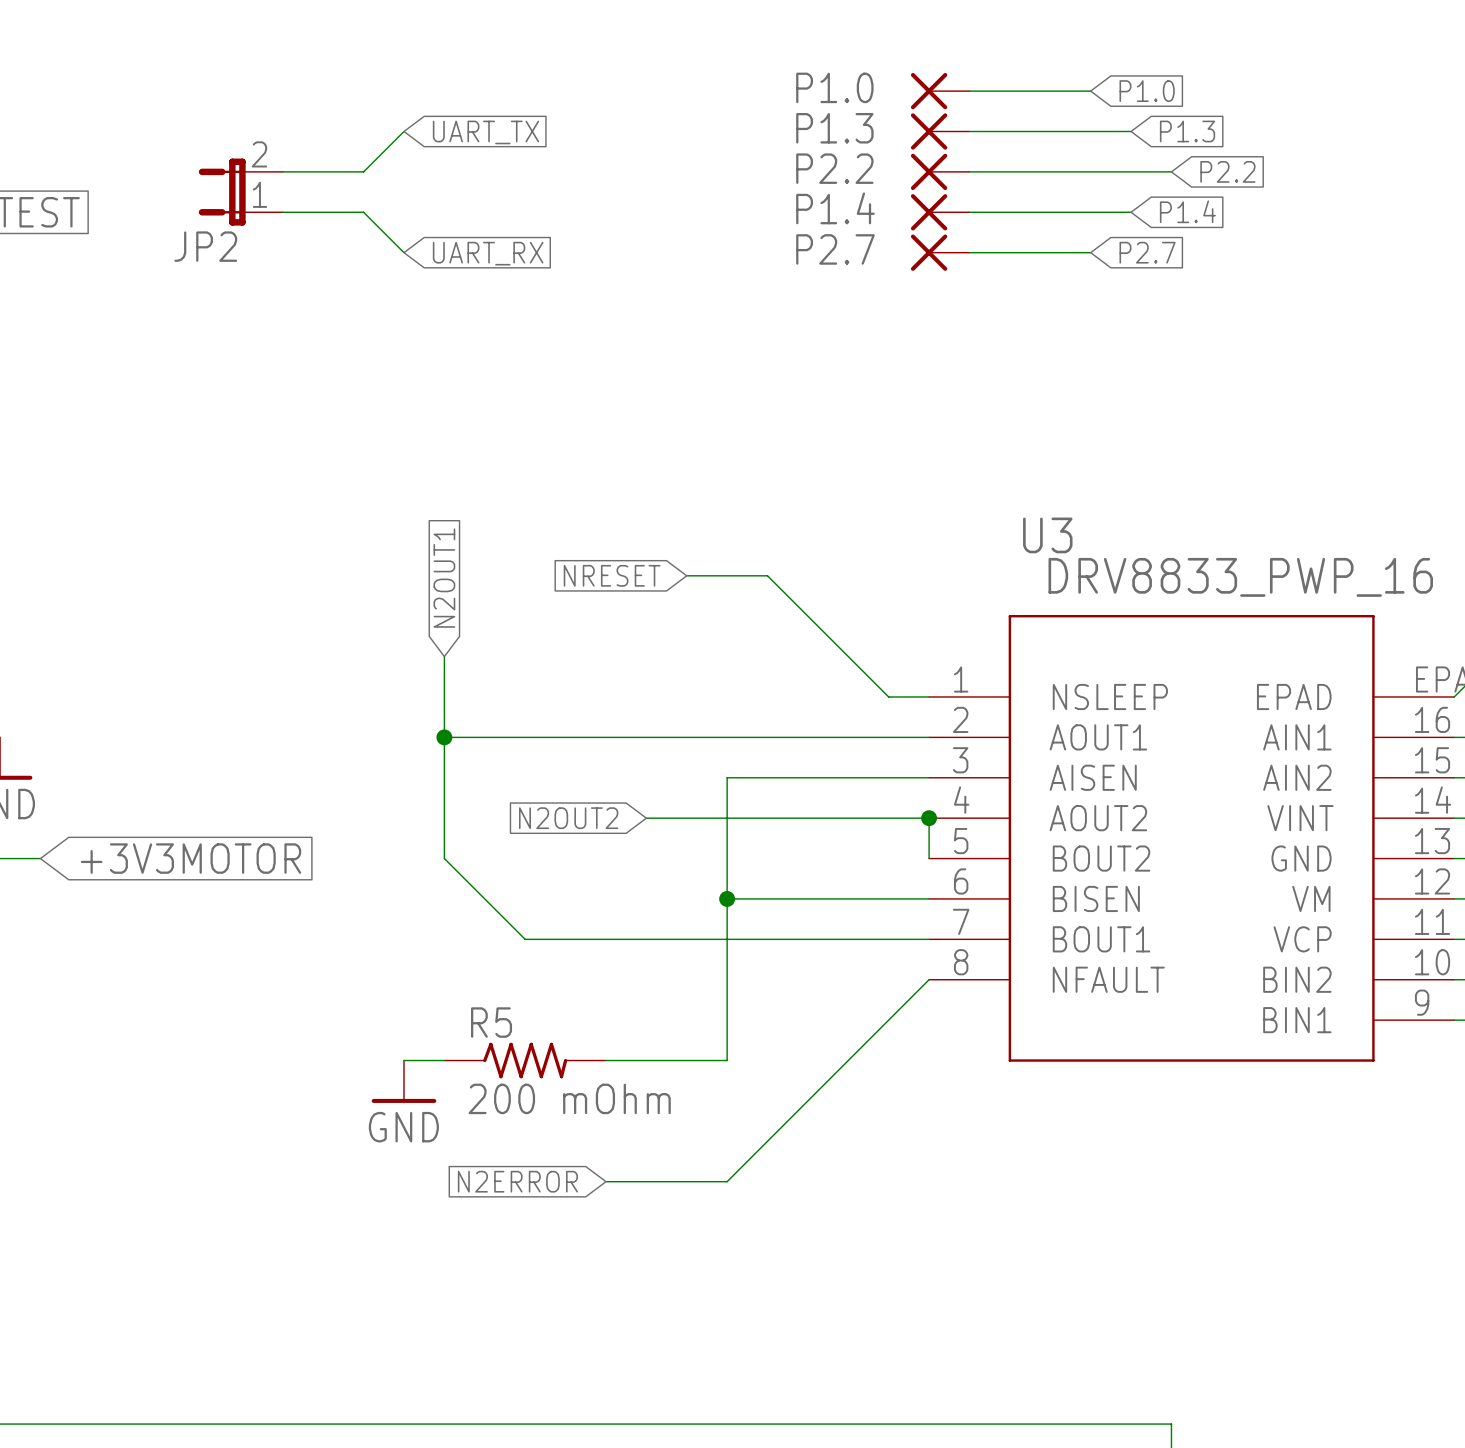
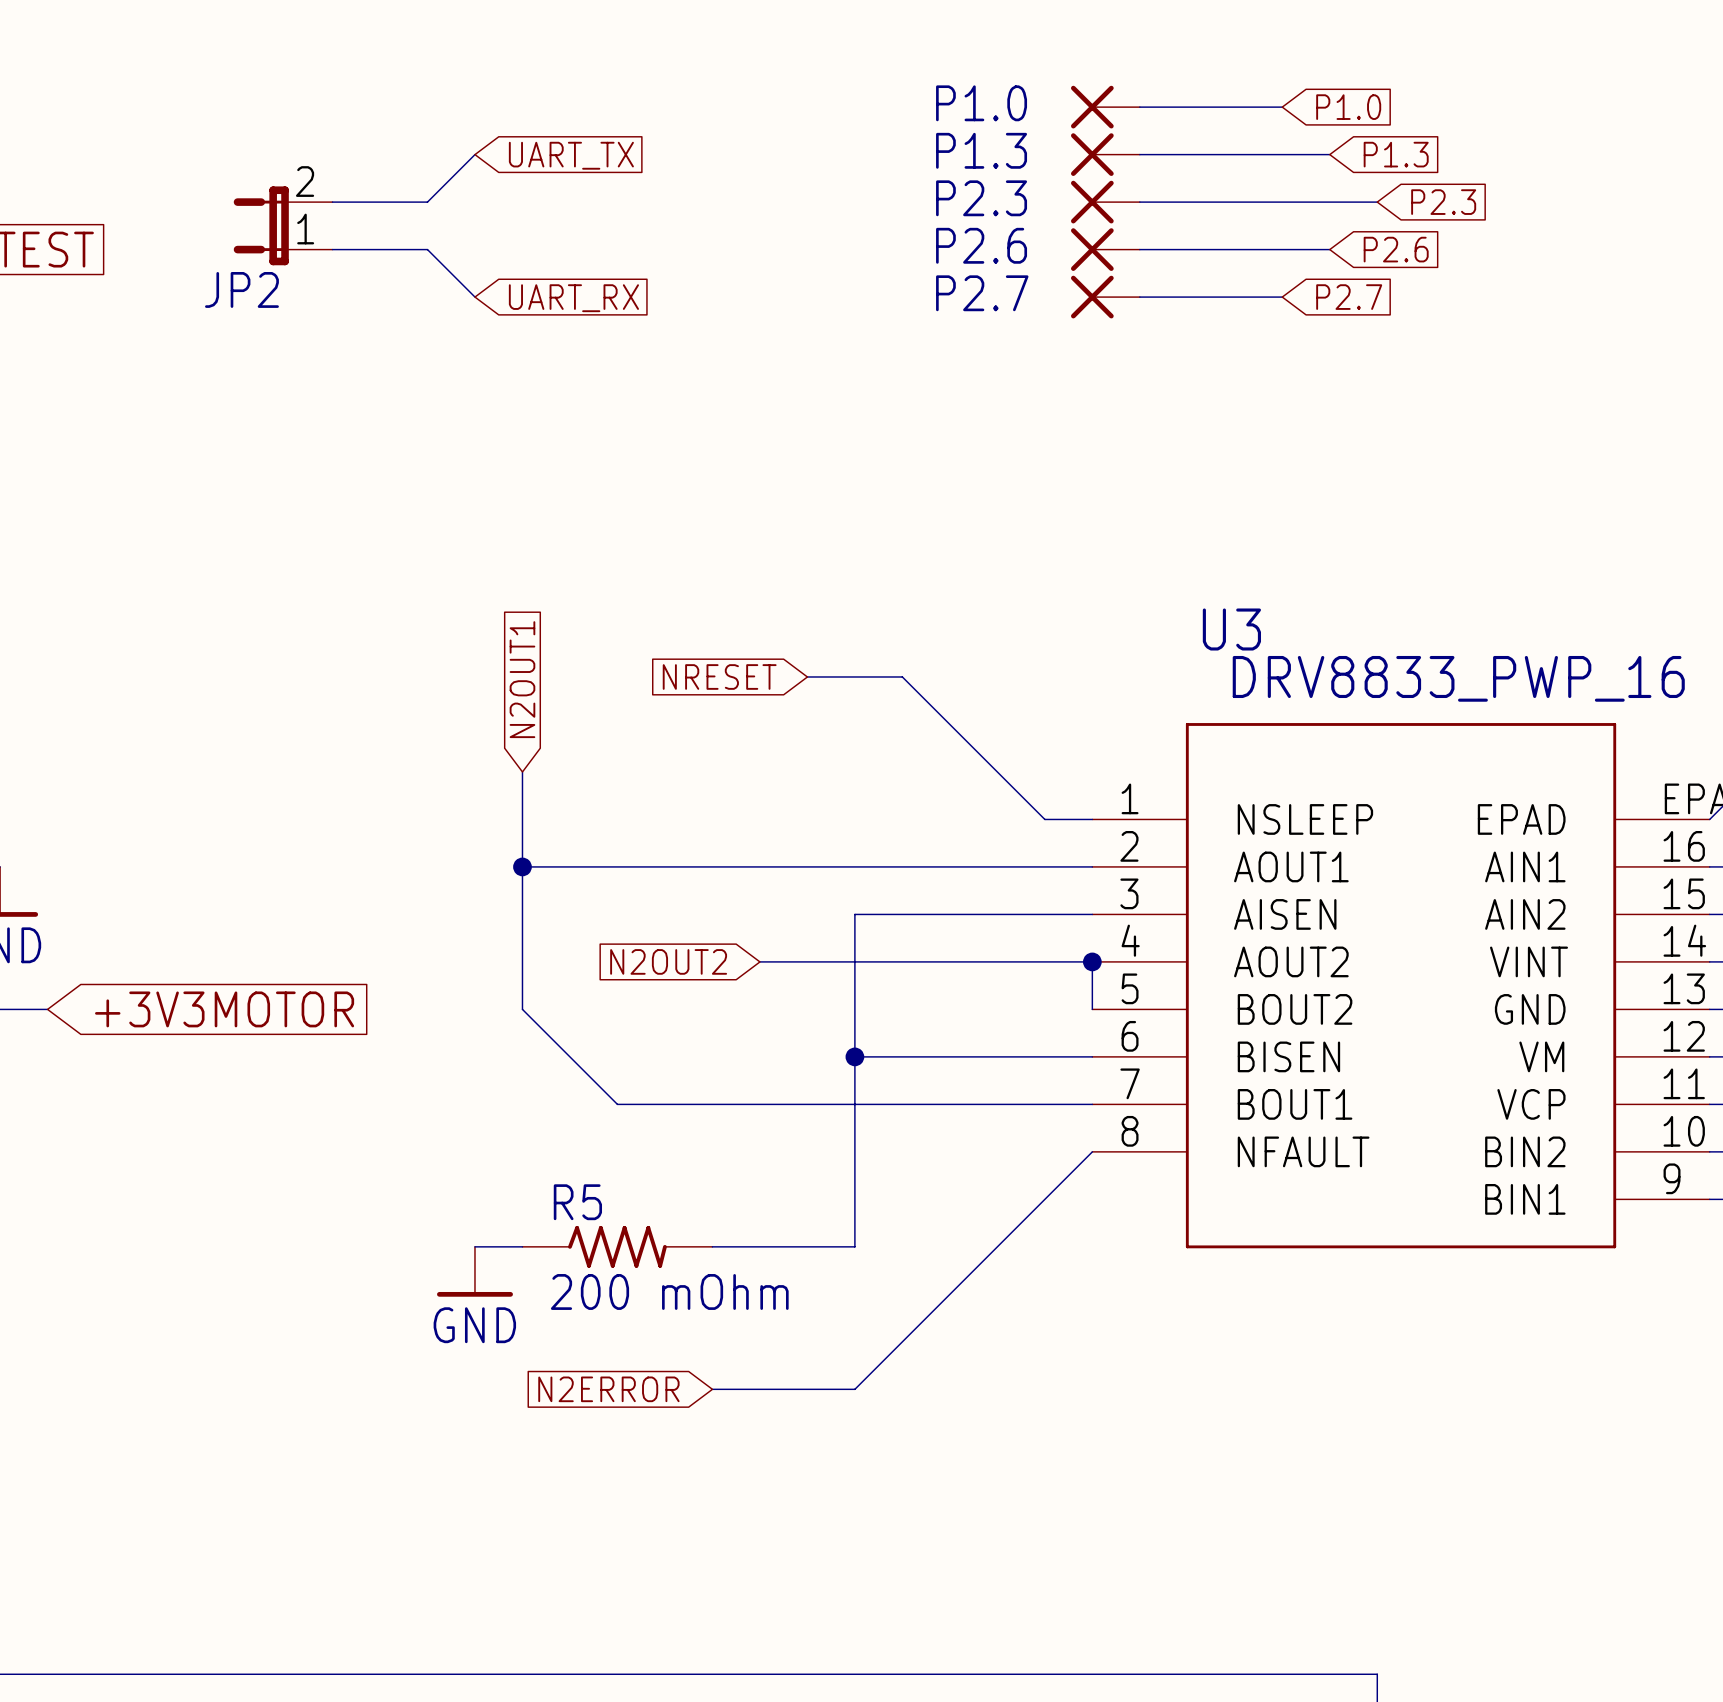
P2.2 name: P2.2 (834, 168) -> P2.3 (981, 198)
global label: P2.2 (1227, 171) -> P2.3 (1443, 202)
P1.4 name: P1.4 (835, 208) -> P2.6 (981, 245)
global label: P1.4 (1187, 211) -> P2.6 (1396, 249)

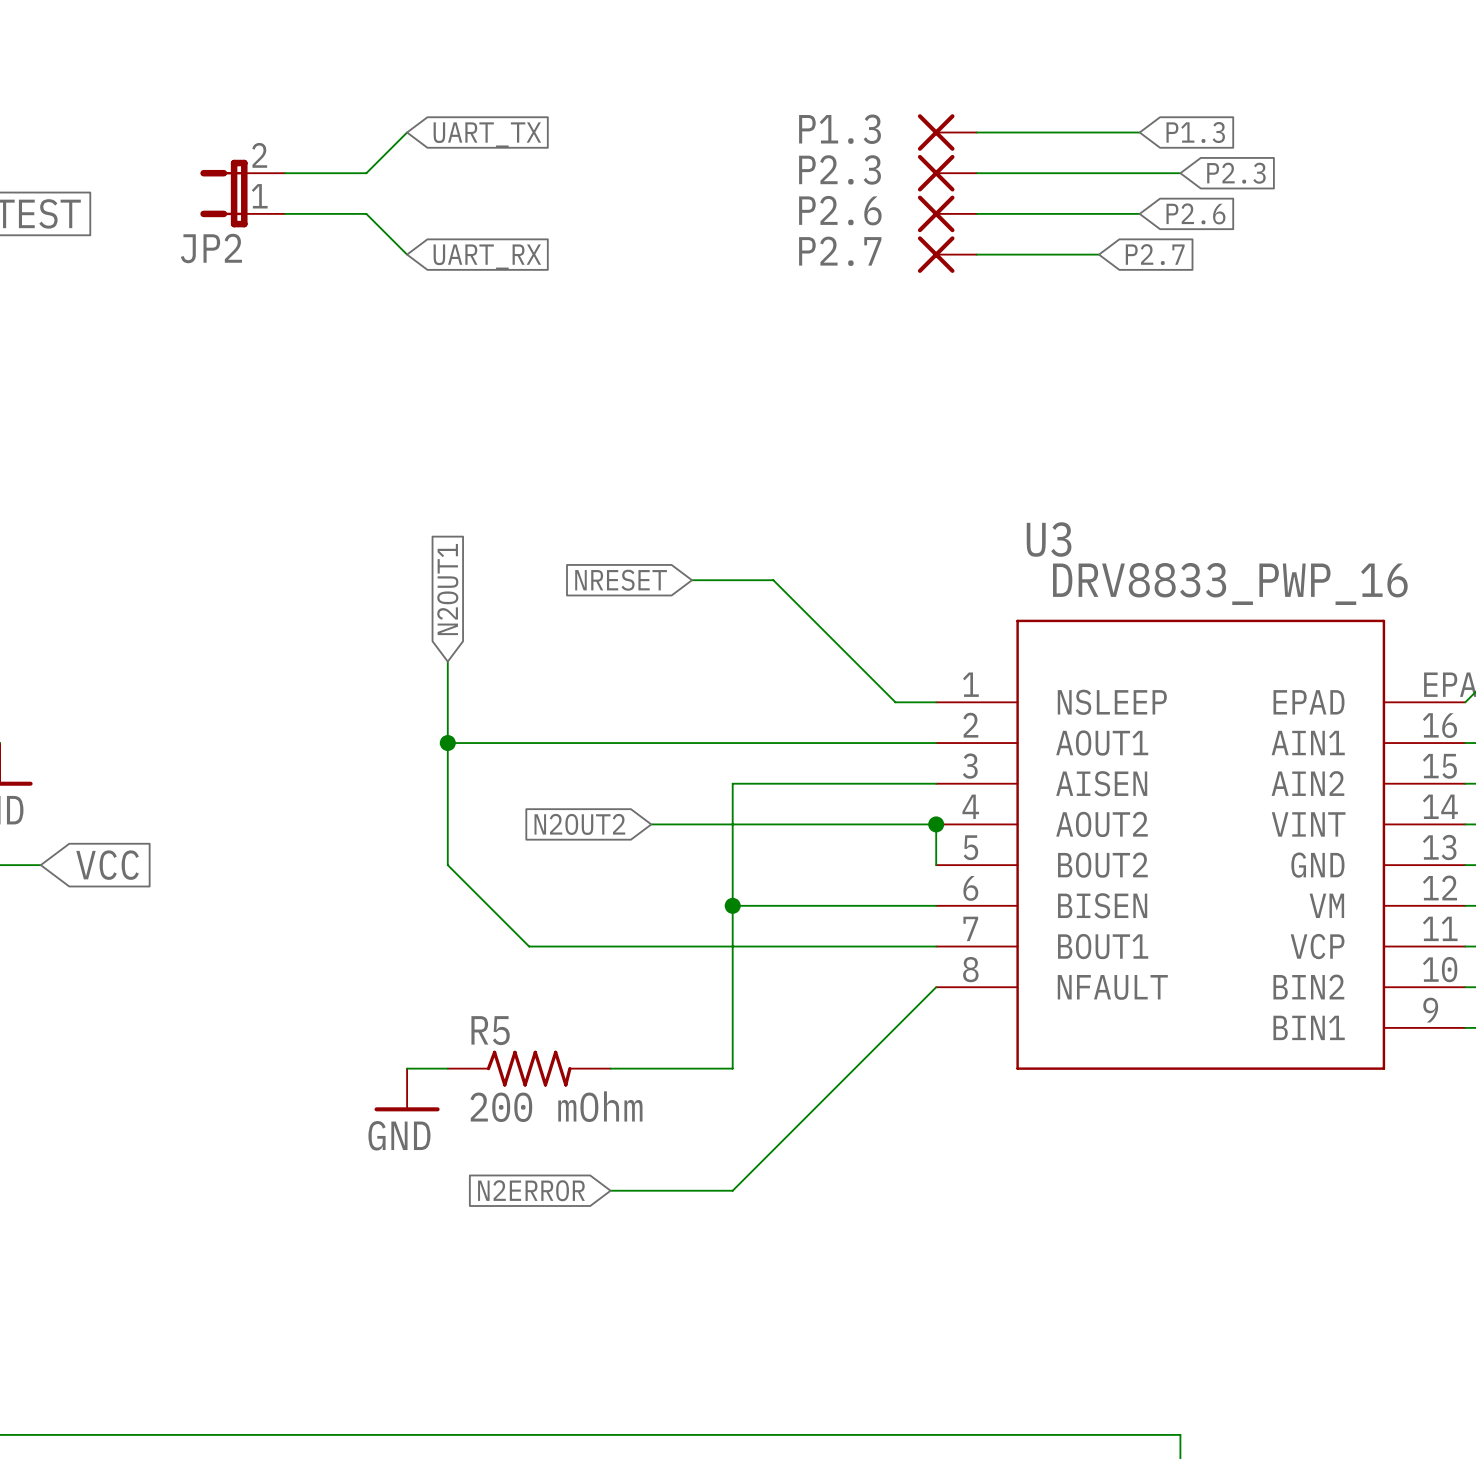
P1.0: (1105, 107) -> none
wire: (1139, 107) (1282, 107) -> none
global label: P1.0 (1348, 107) -> none
global label: +3V3MOTOR (224, 1009) -> VCC (107, 865)

